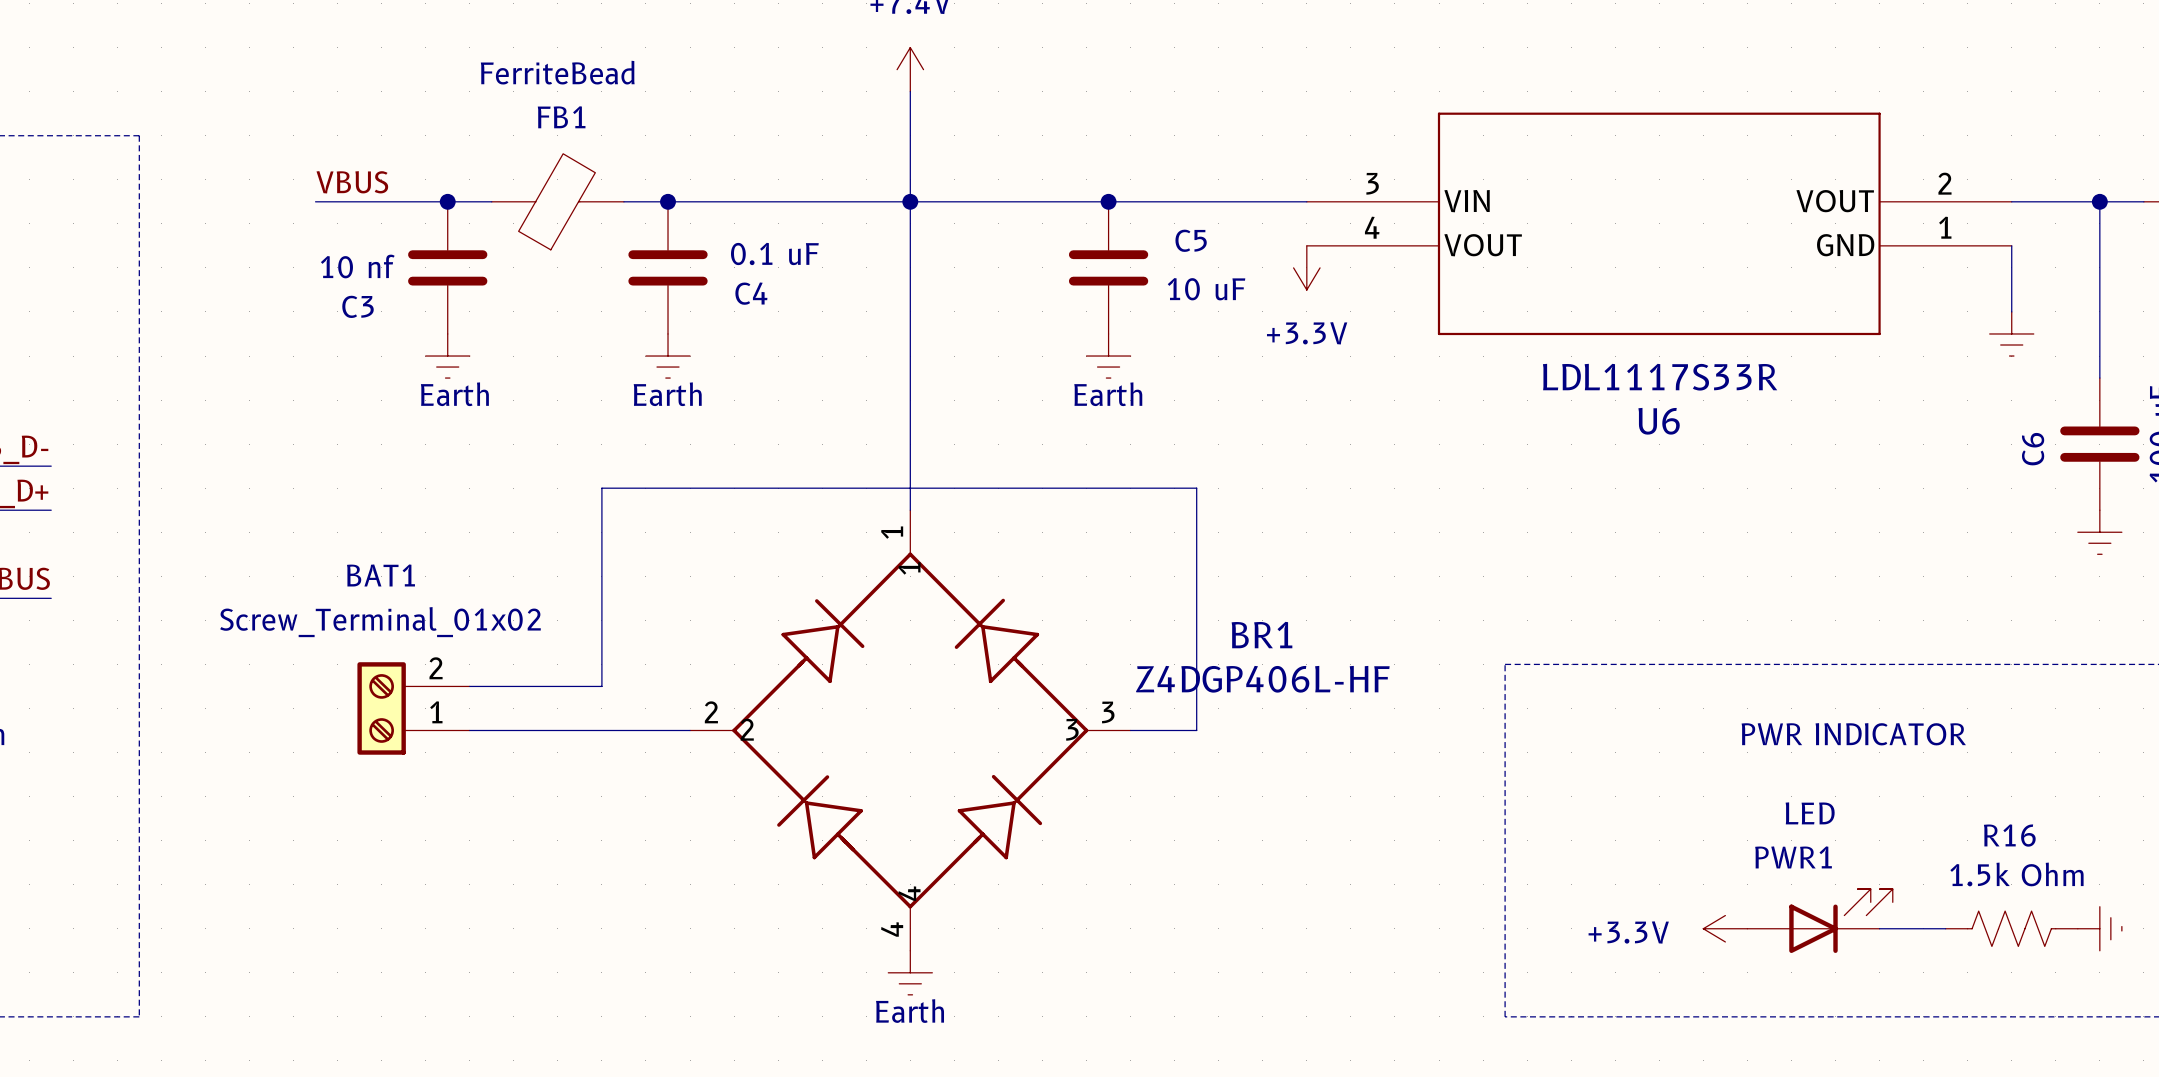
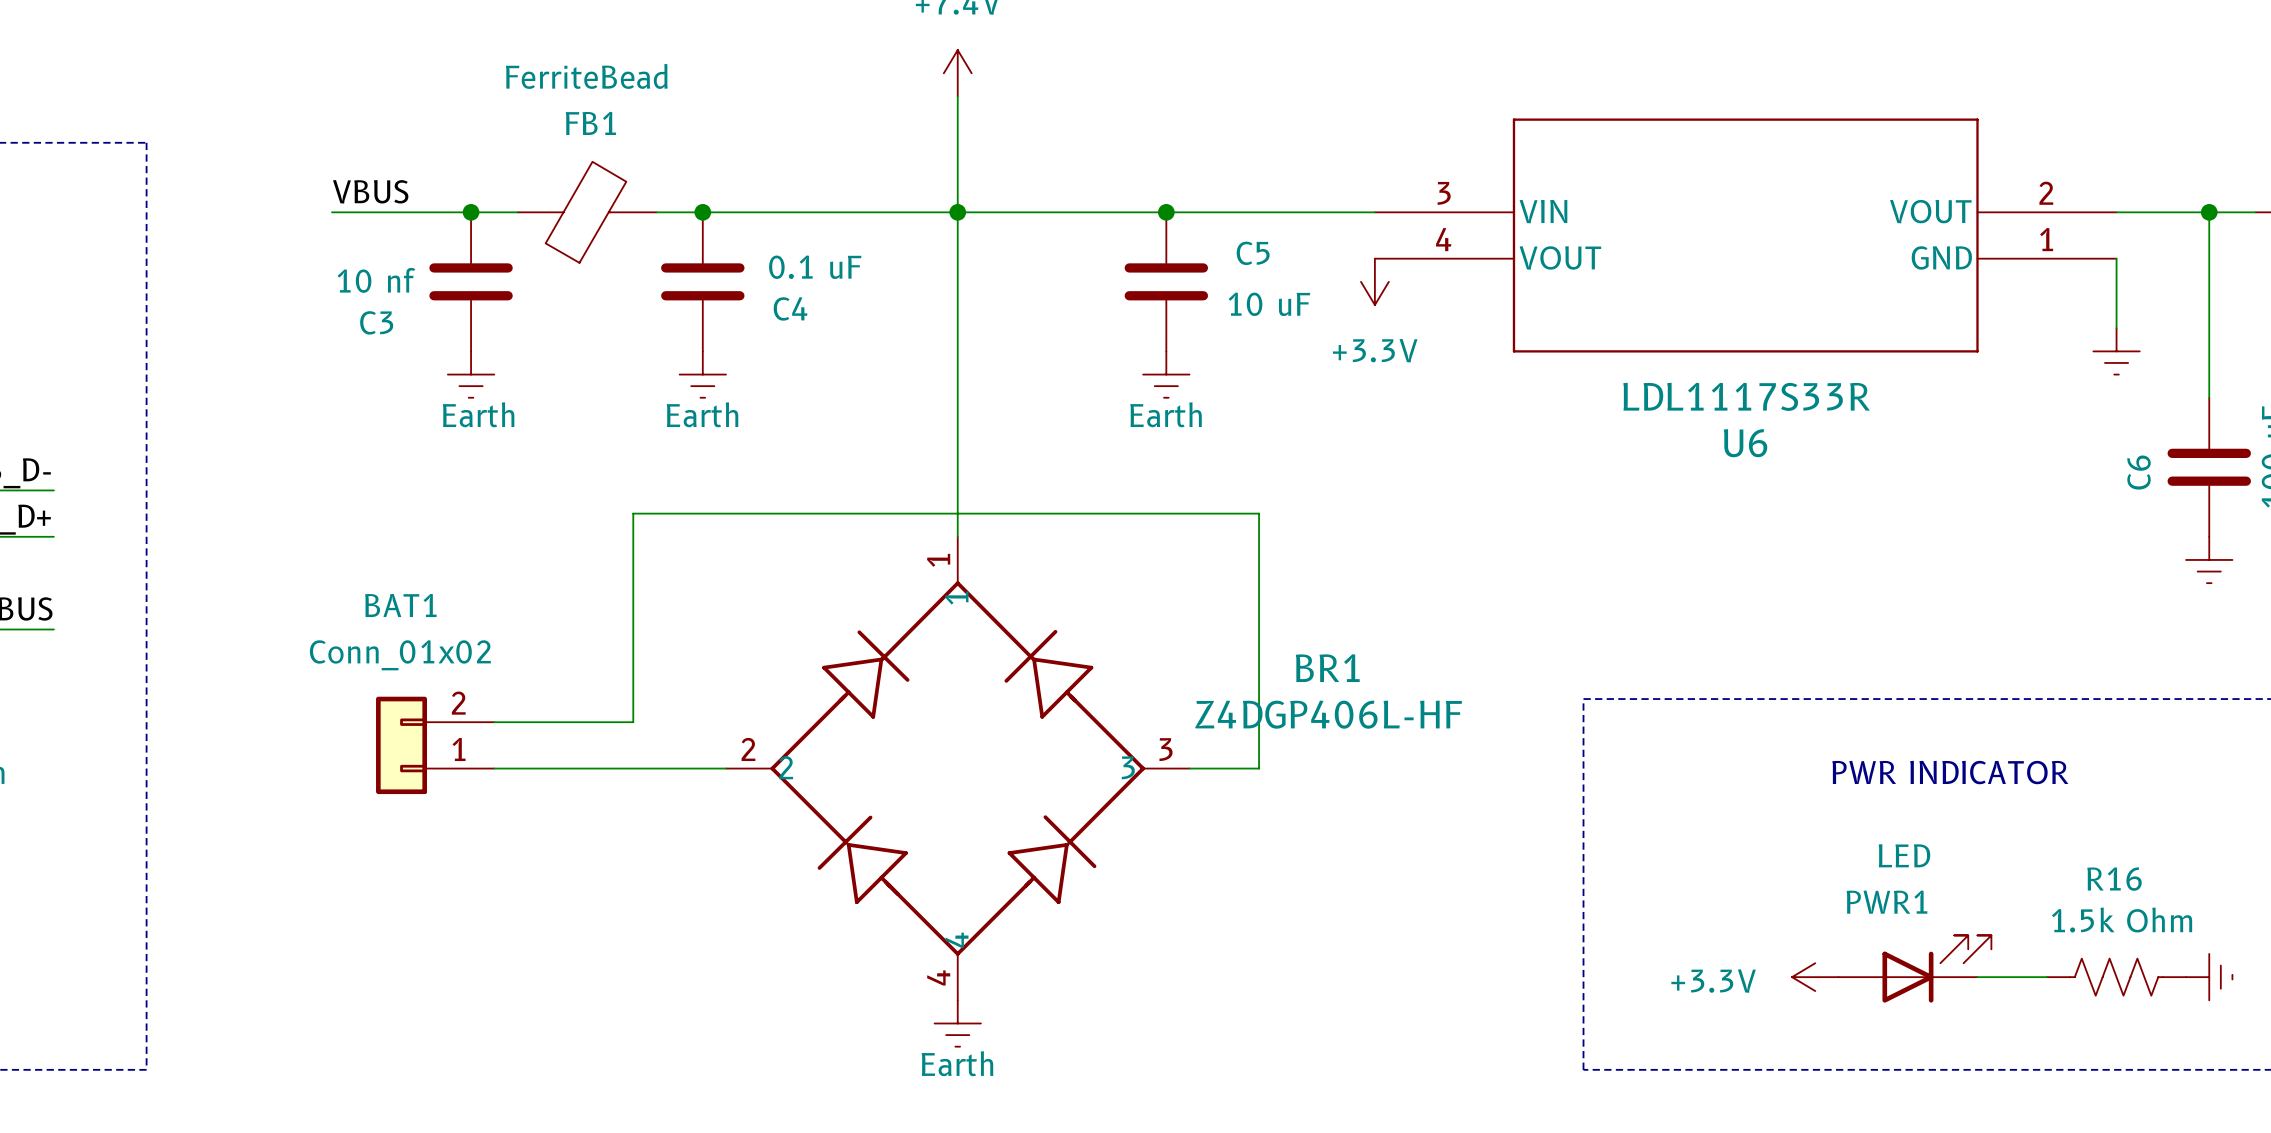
BAT1 value: Screw_Terminal_01x02 (380, 622) -> Conn_01x02 (400, 655)
BAT1 symbol: [357, 662, 470, 755] -> [376, 696, 495, 795]

